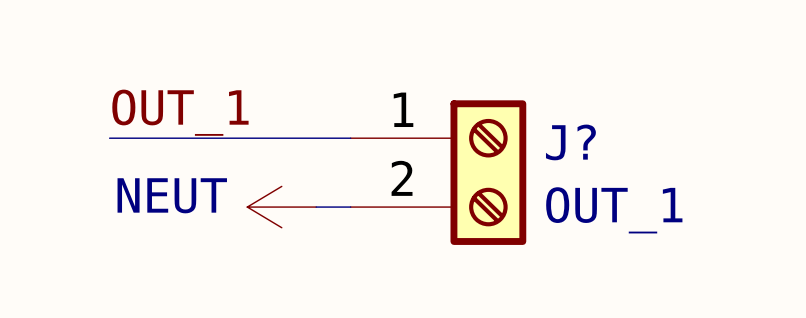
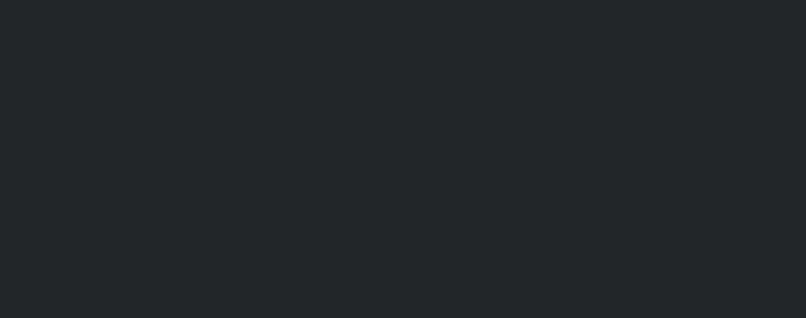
label: OUT_1 (180, 112) -> none
wire: (109, 138) (350, 138) -> none
J?: OUT_1 (438, 172) -> none
power symbol: NEUT (281, 207) -> none
wire: (316, 207) (350, 207) -> none

